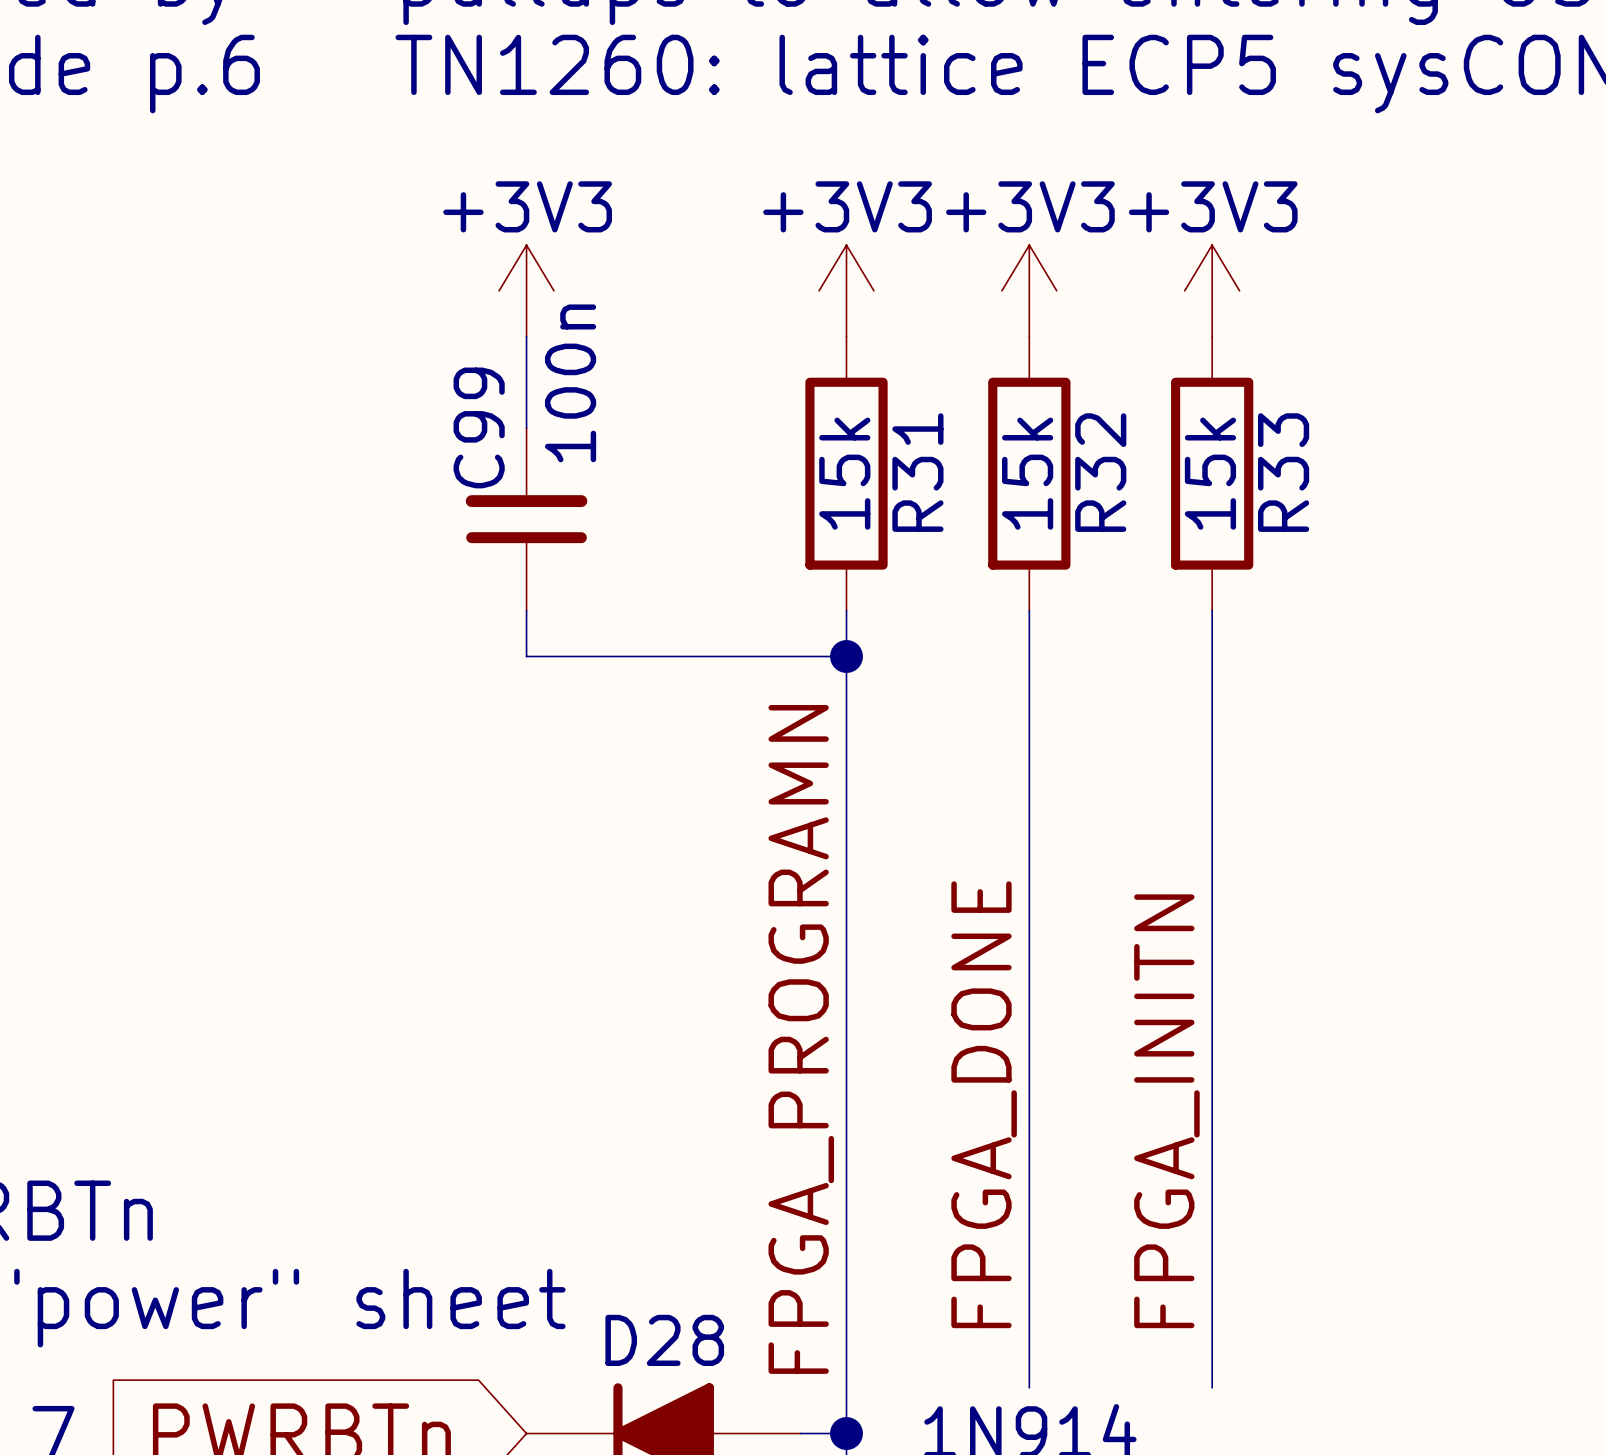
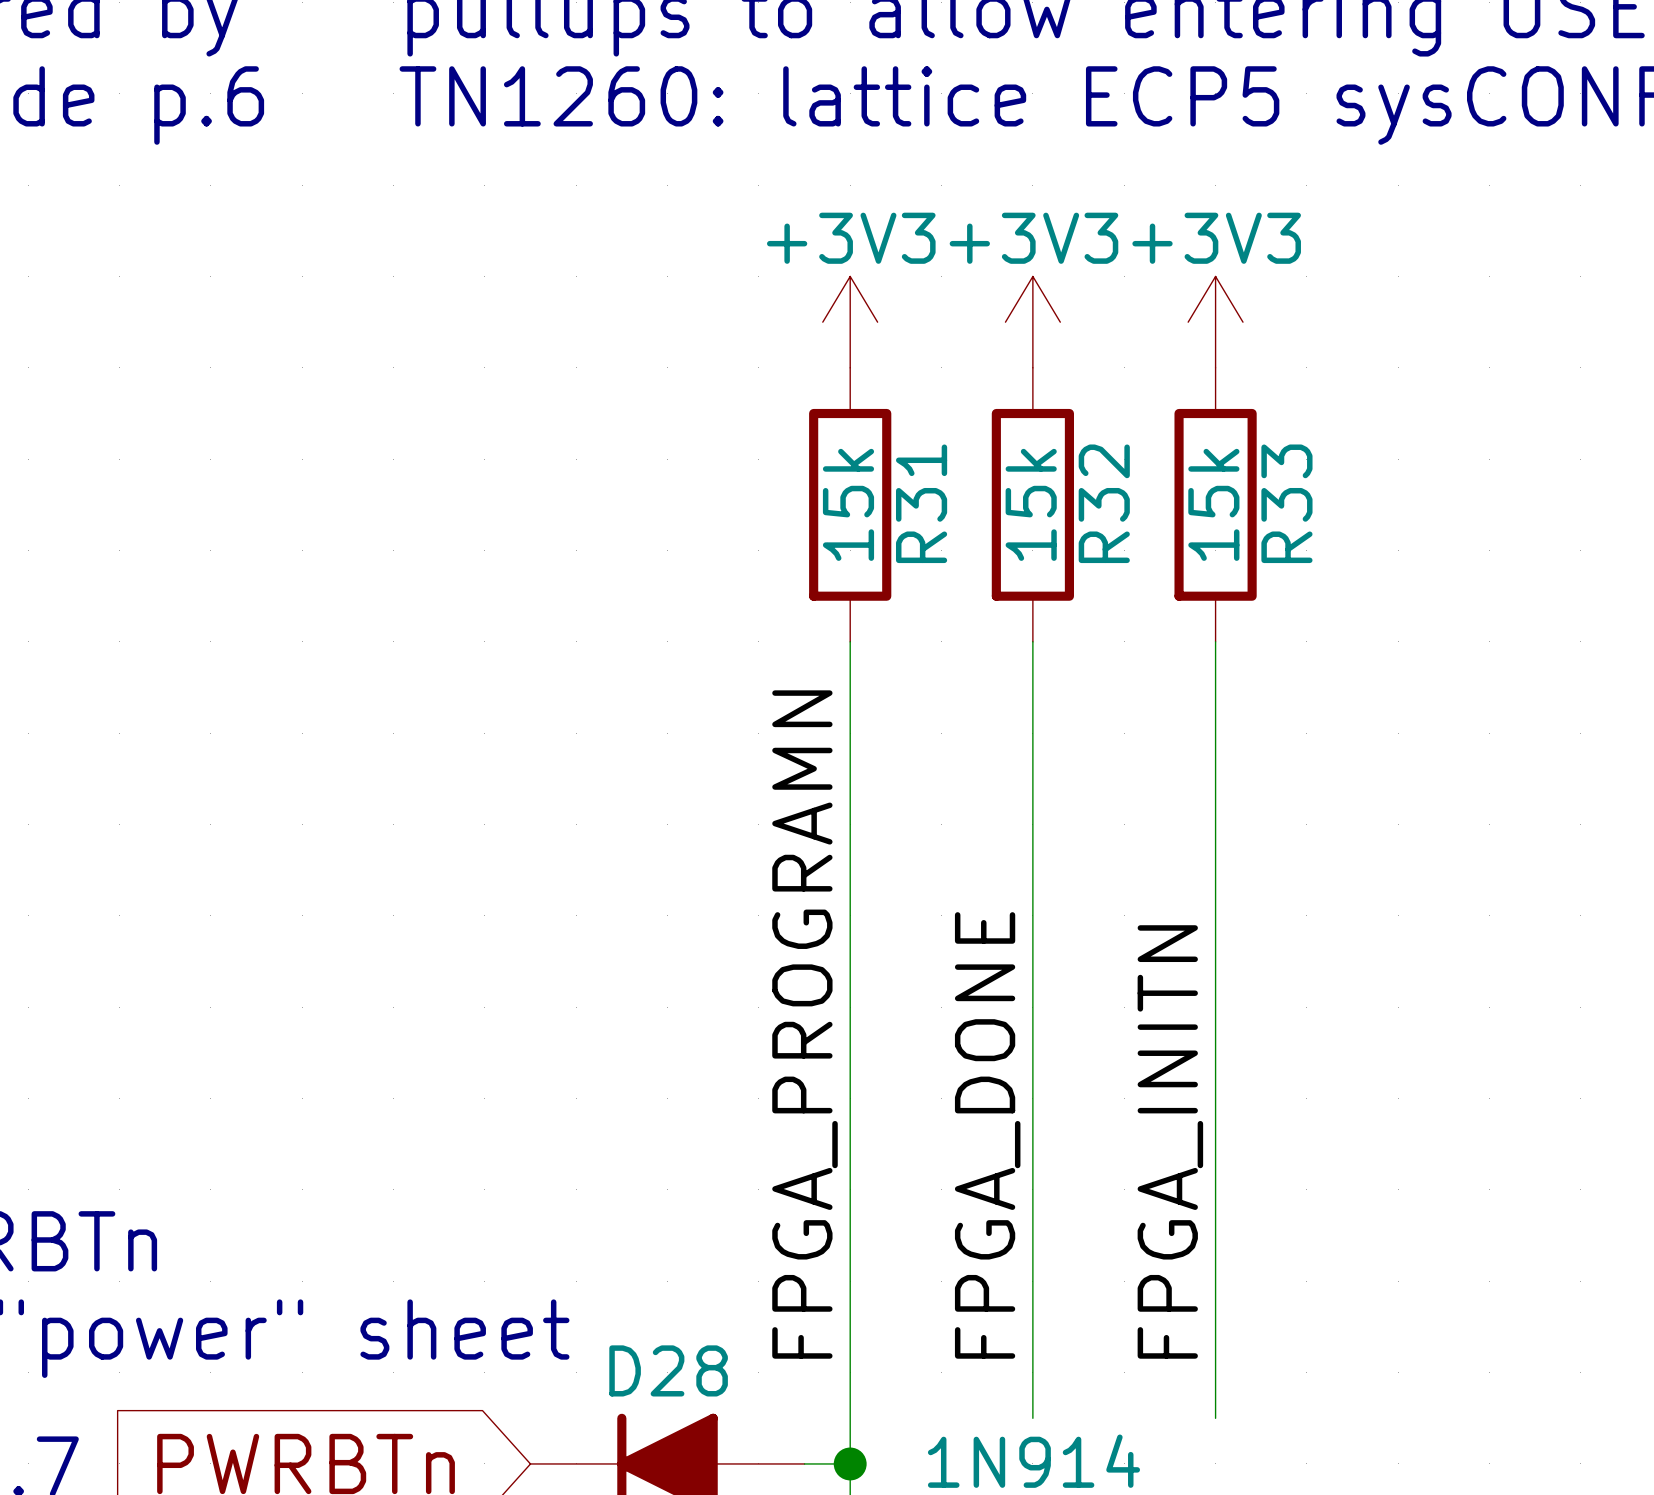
power symbol: +3V3 (526, 290) -> none
wire: (526, 336) (526, 427) -> none
C99: 100n (526, 519) -> none
wire: (526, 610) (526, 656) (846, 656) -> none
junction: (846, 656) -> none
label position: FPGA_PROGRAMN (801, 1039) -> FPGA_PROGRAMN (804, 1024)

